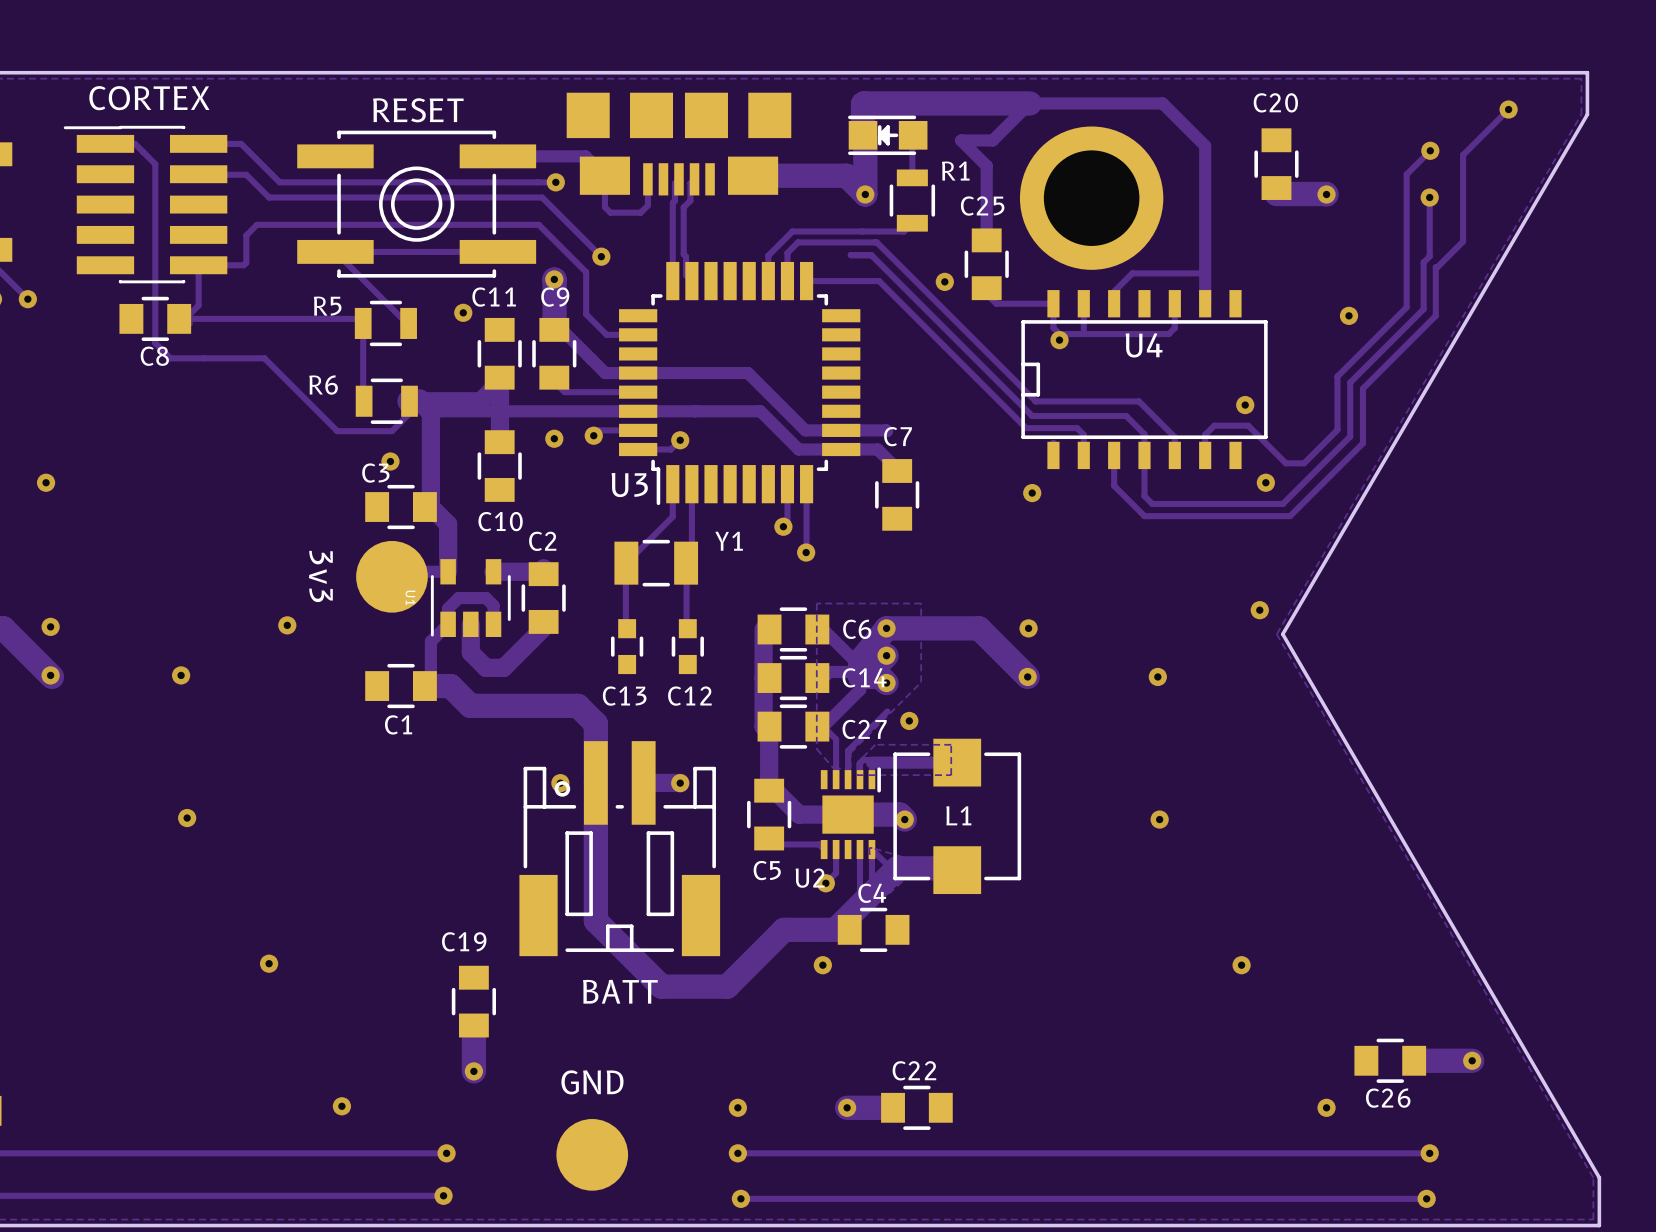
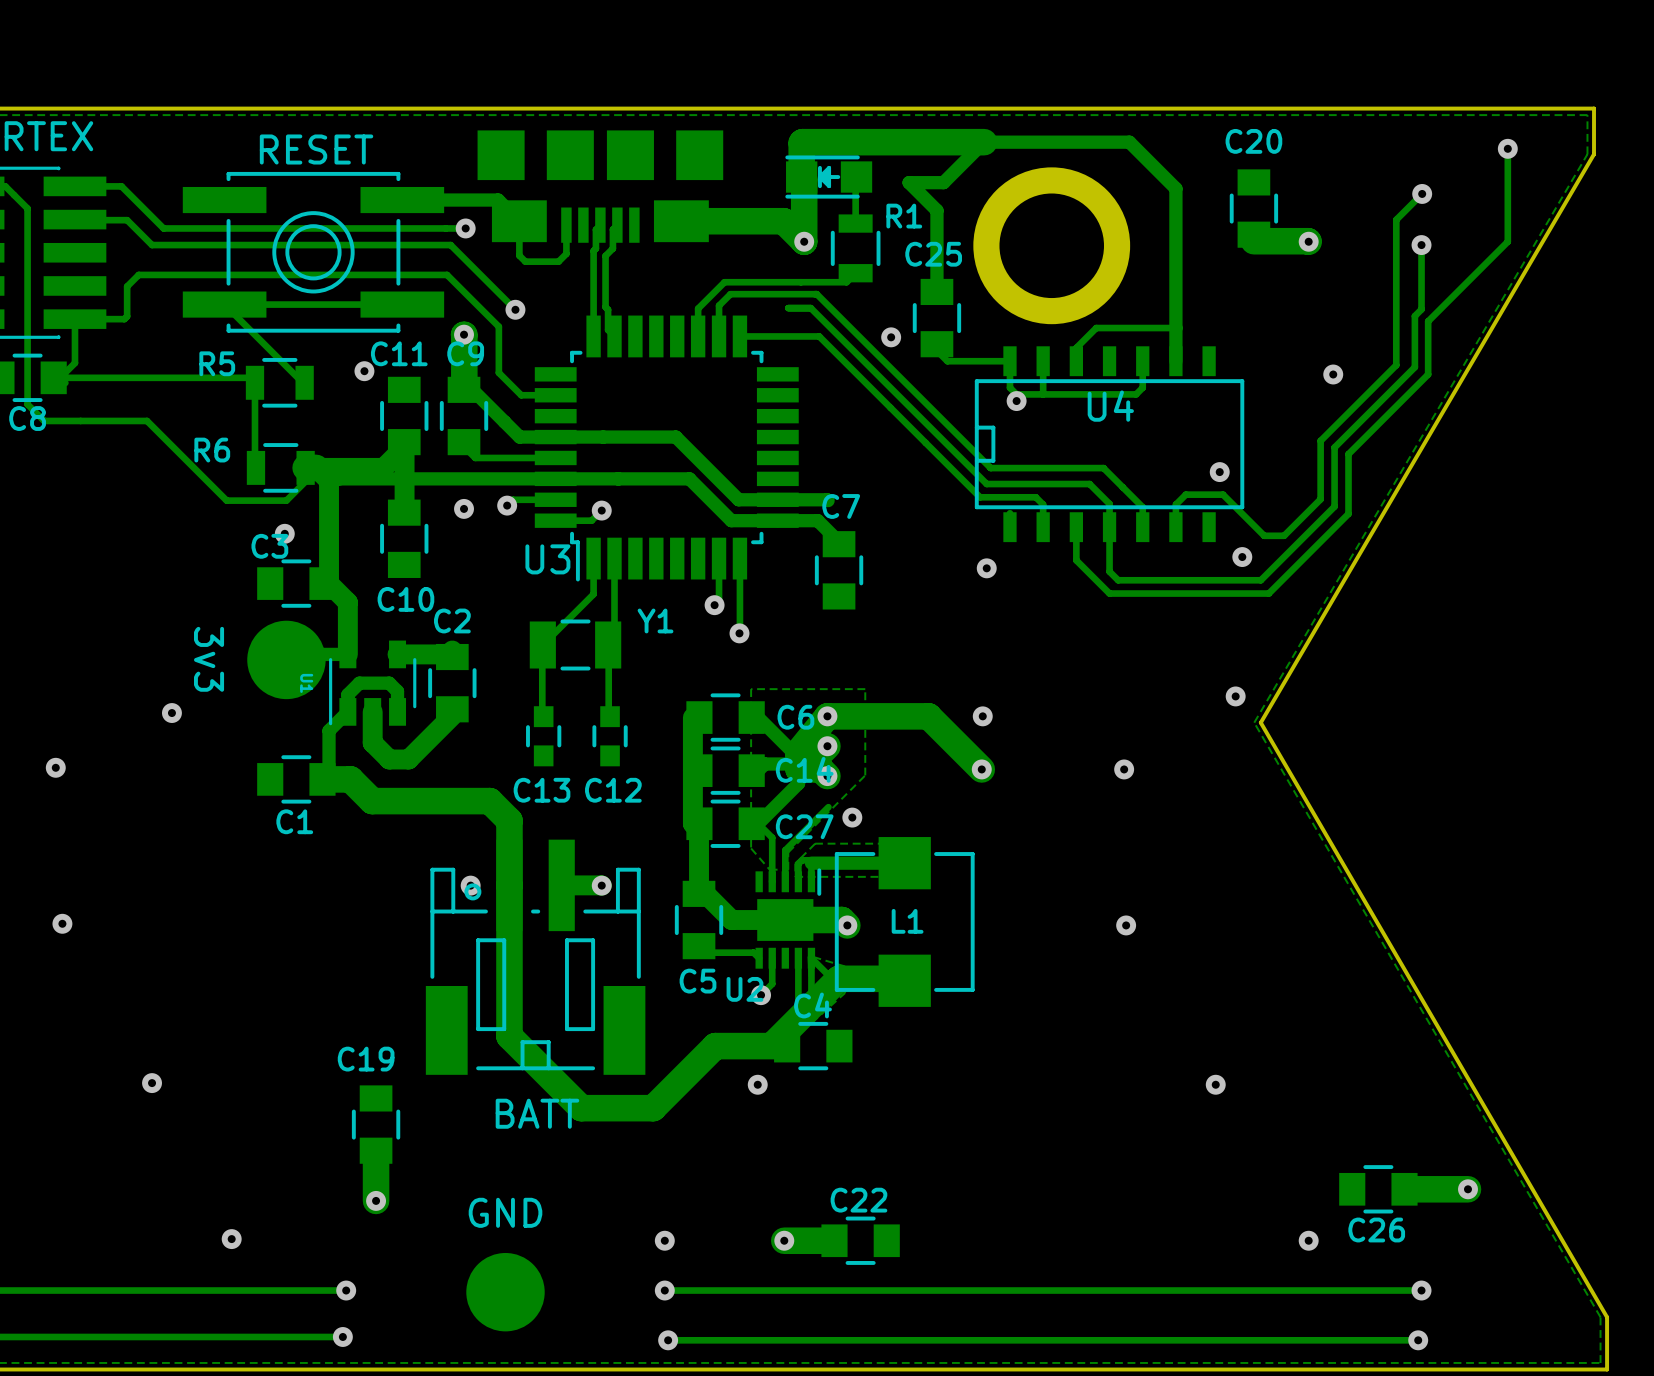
track: (1508, 109) (1463, 155) (1463, 241) (1435, 267) -> (1507, 148) (1507, 241) (1428, 321)

